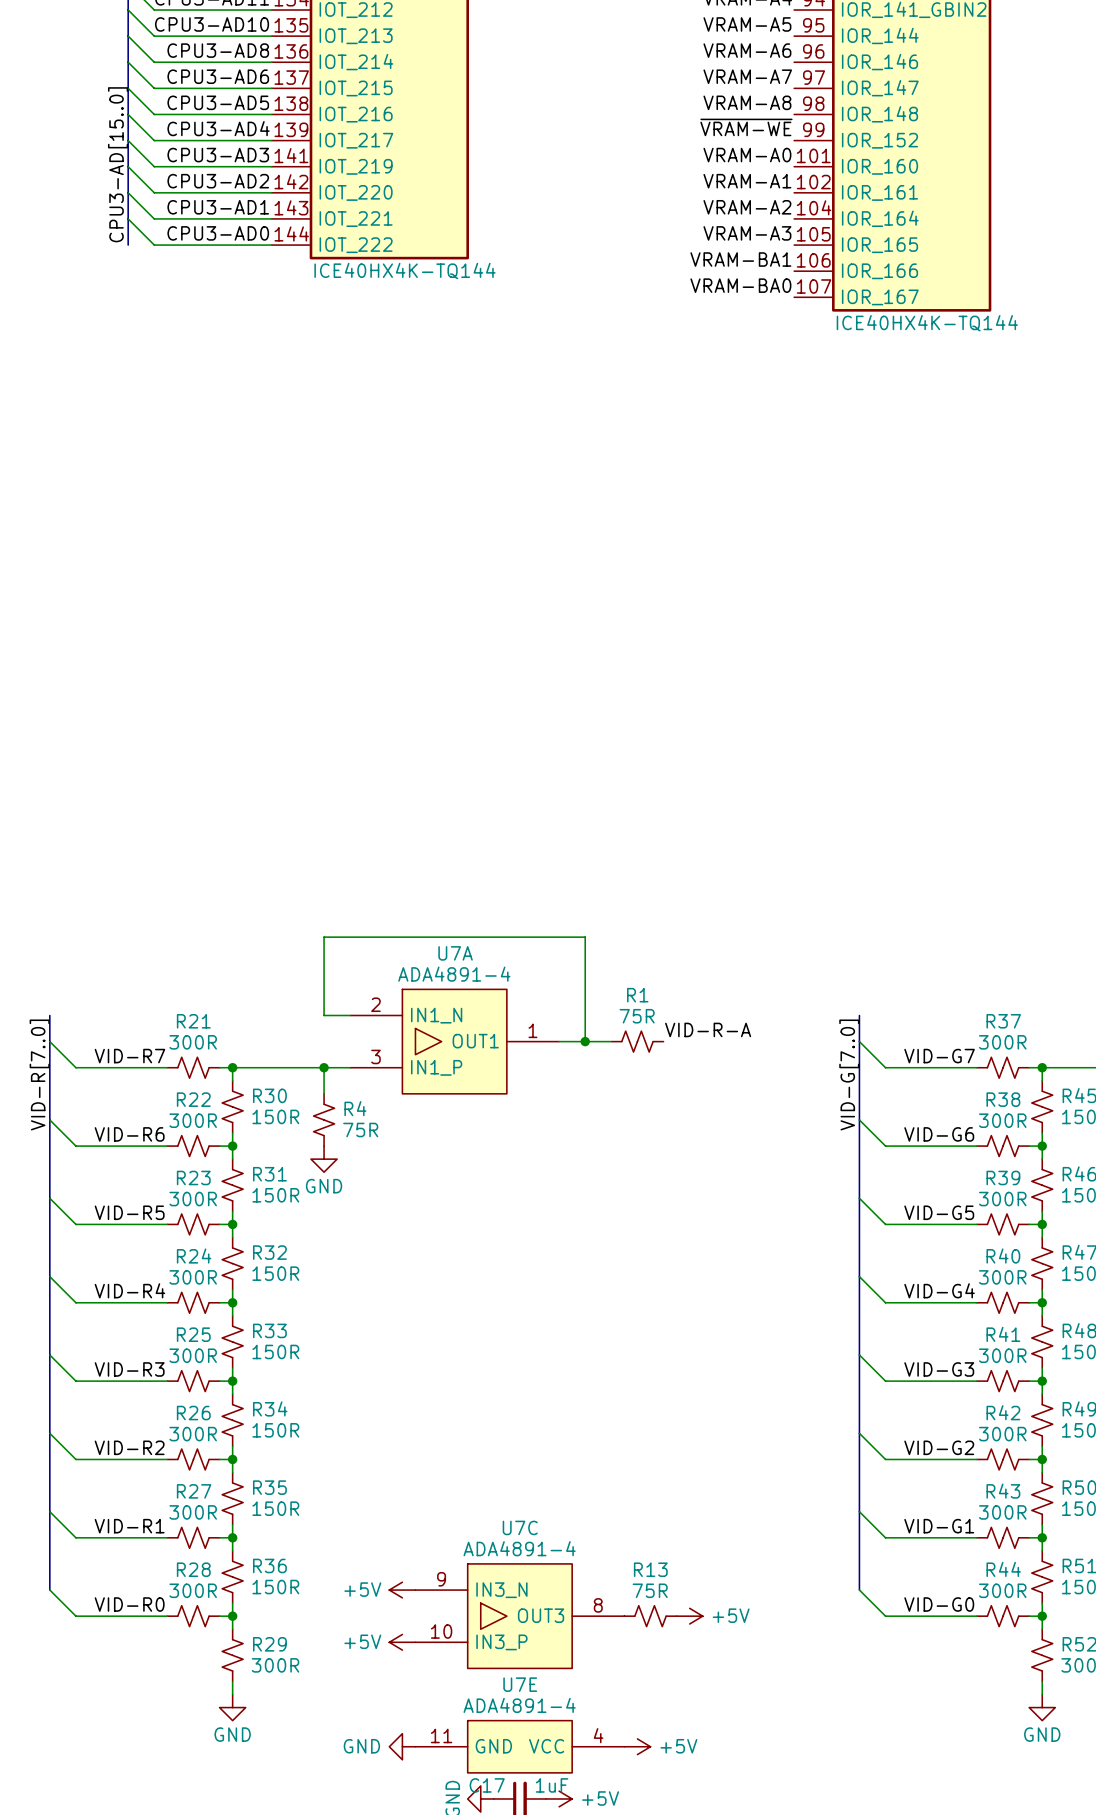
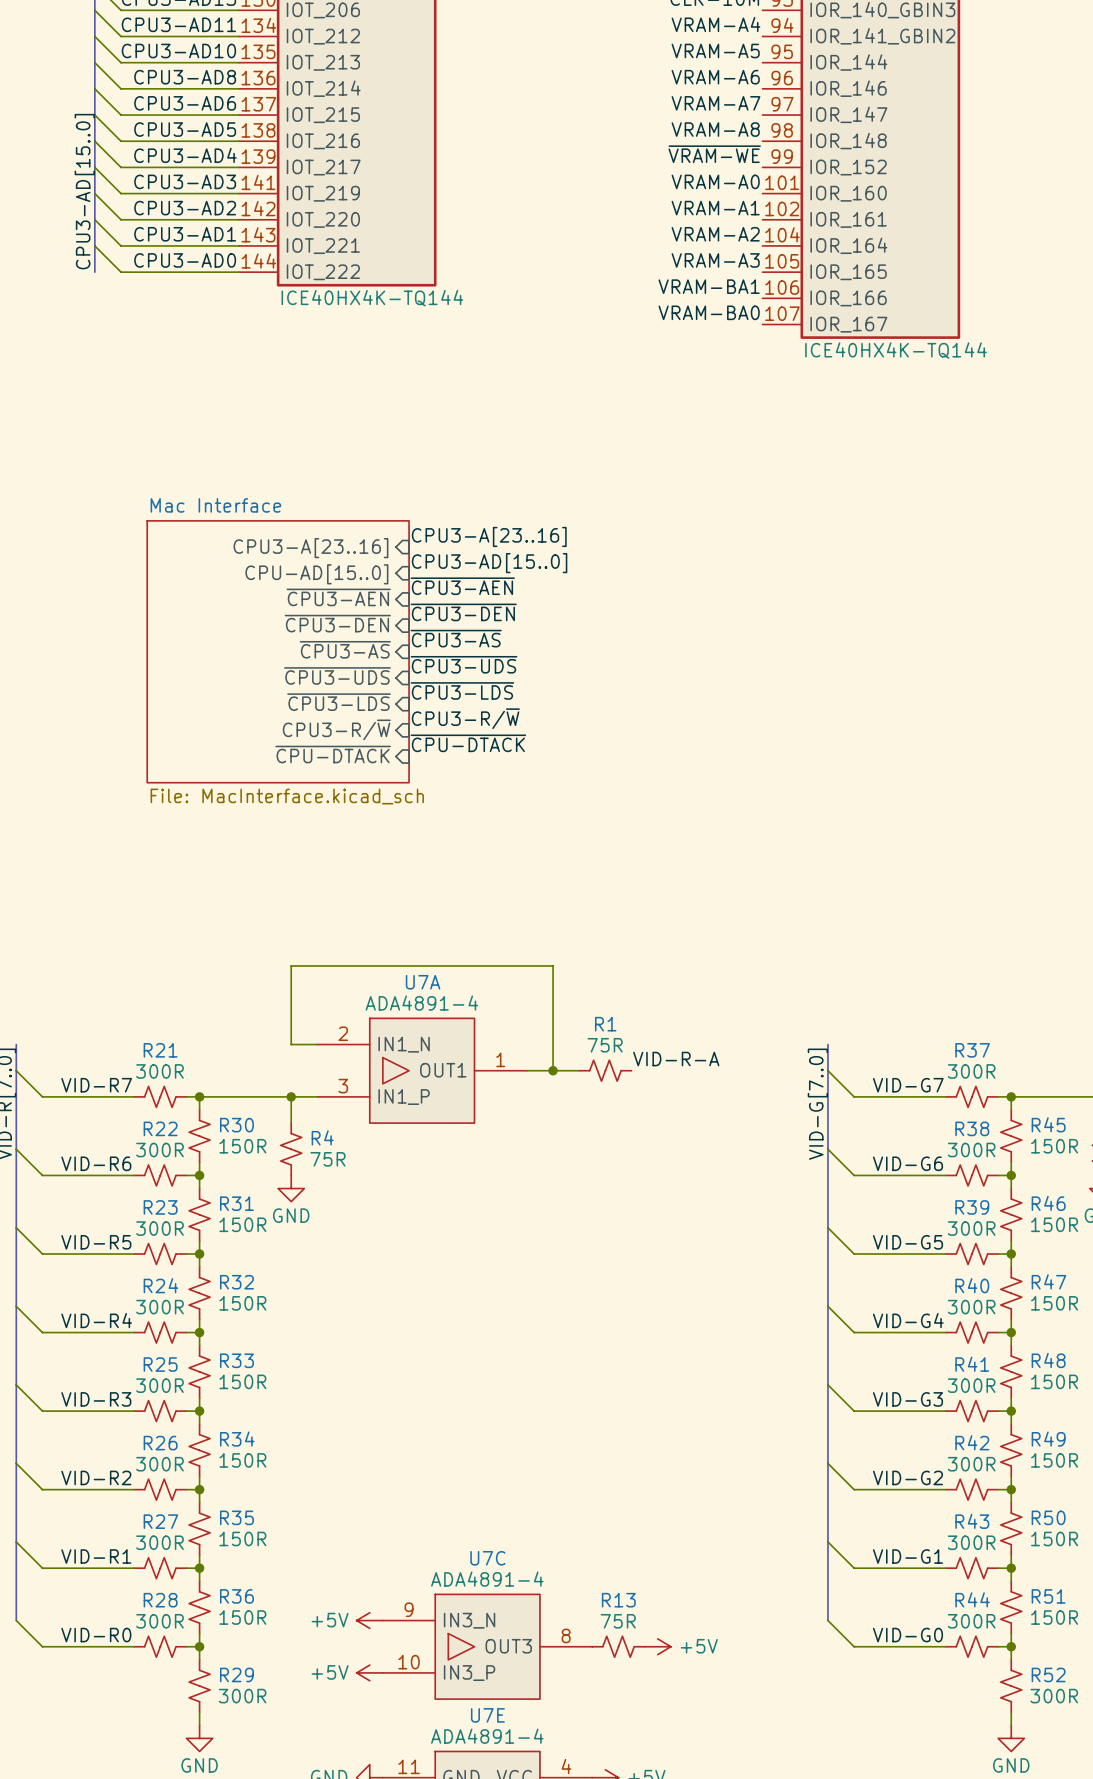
label: none -> CPU3-A[23..16] (489, 536)
sheet pin: none -> CPU3-A[23..16] (310, 548)
label: none -> CPU3-AD[15..0] (489, 563)
sheet pin: none -> CPU-AD[15..0] (316, 574)
label: none -> ~{CPU3-AEN} (462, 586)
sheet pin: none -> ~{CPU3-AEN} (338, 597)
label: none -> ~{CPU3-DEN} (463, 612)
sheet pin: none -> ~{CPU3-DEN} (337, 623)
label: none -> ~{CPU3-AS} (456, 638)
sheet pin: none -> ~{CPU3-AS} (345, 649)
sheet Mac Interface: none -> File: MacInterface.kicad_sch (278, 651)
label: none -> ~{CPU3-UDS} (464, 664)
sheet pin: none -> ~{CPU3-UDS} (337, 675)
label: none -> ~{CPU3-LDS} (462, 690)
sheet pin: none -> ~{CPU3-LDS} (339, 702)
label: none -> CPU3-R/~{W} (465, 718)
sheet pin: none -> CPU3-R/~{W} (336, 729)
label: none -> ~{CPU-DTACK} (468, 743)
sheet pin: none -> ~{CPU-DTACK} (333, 754)

